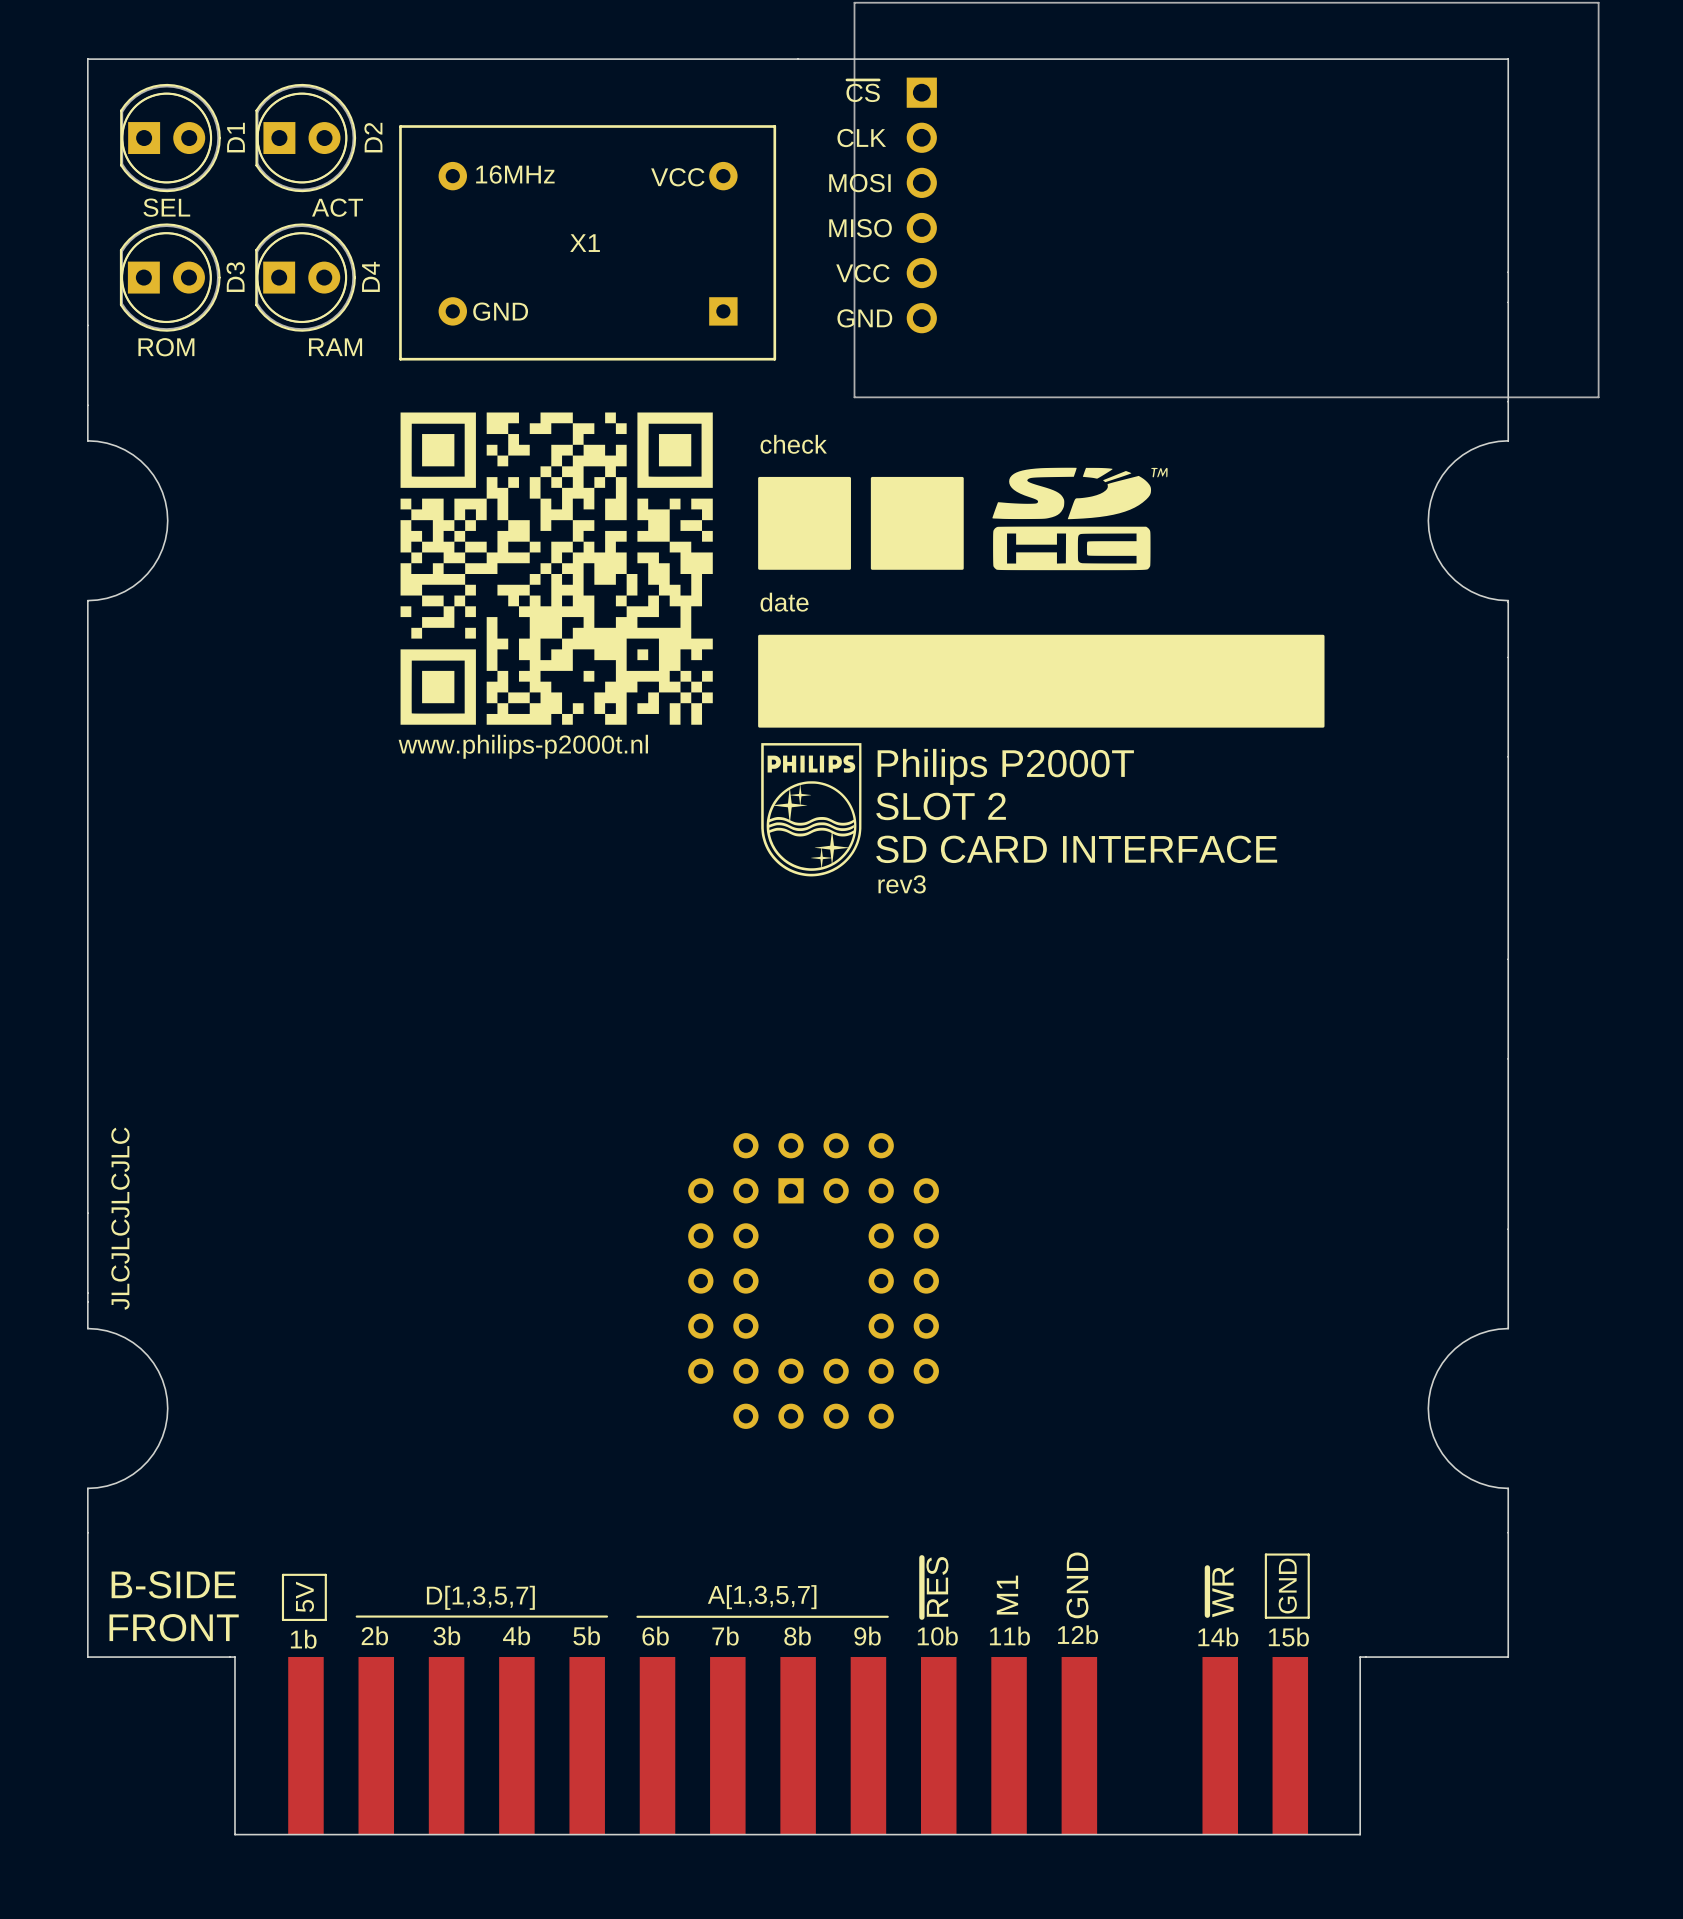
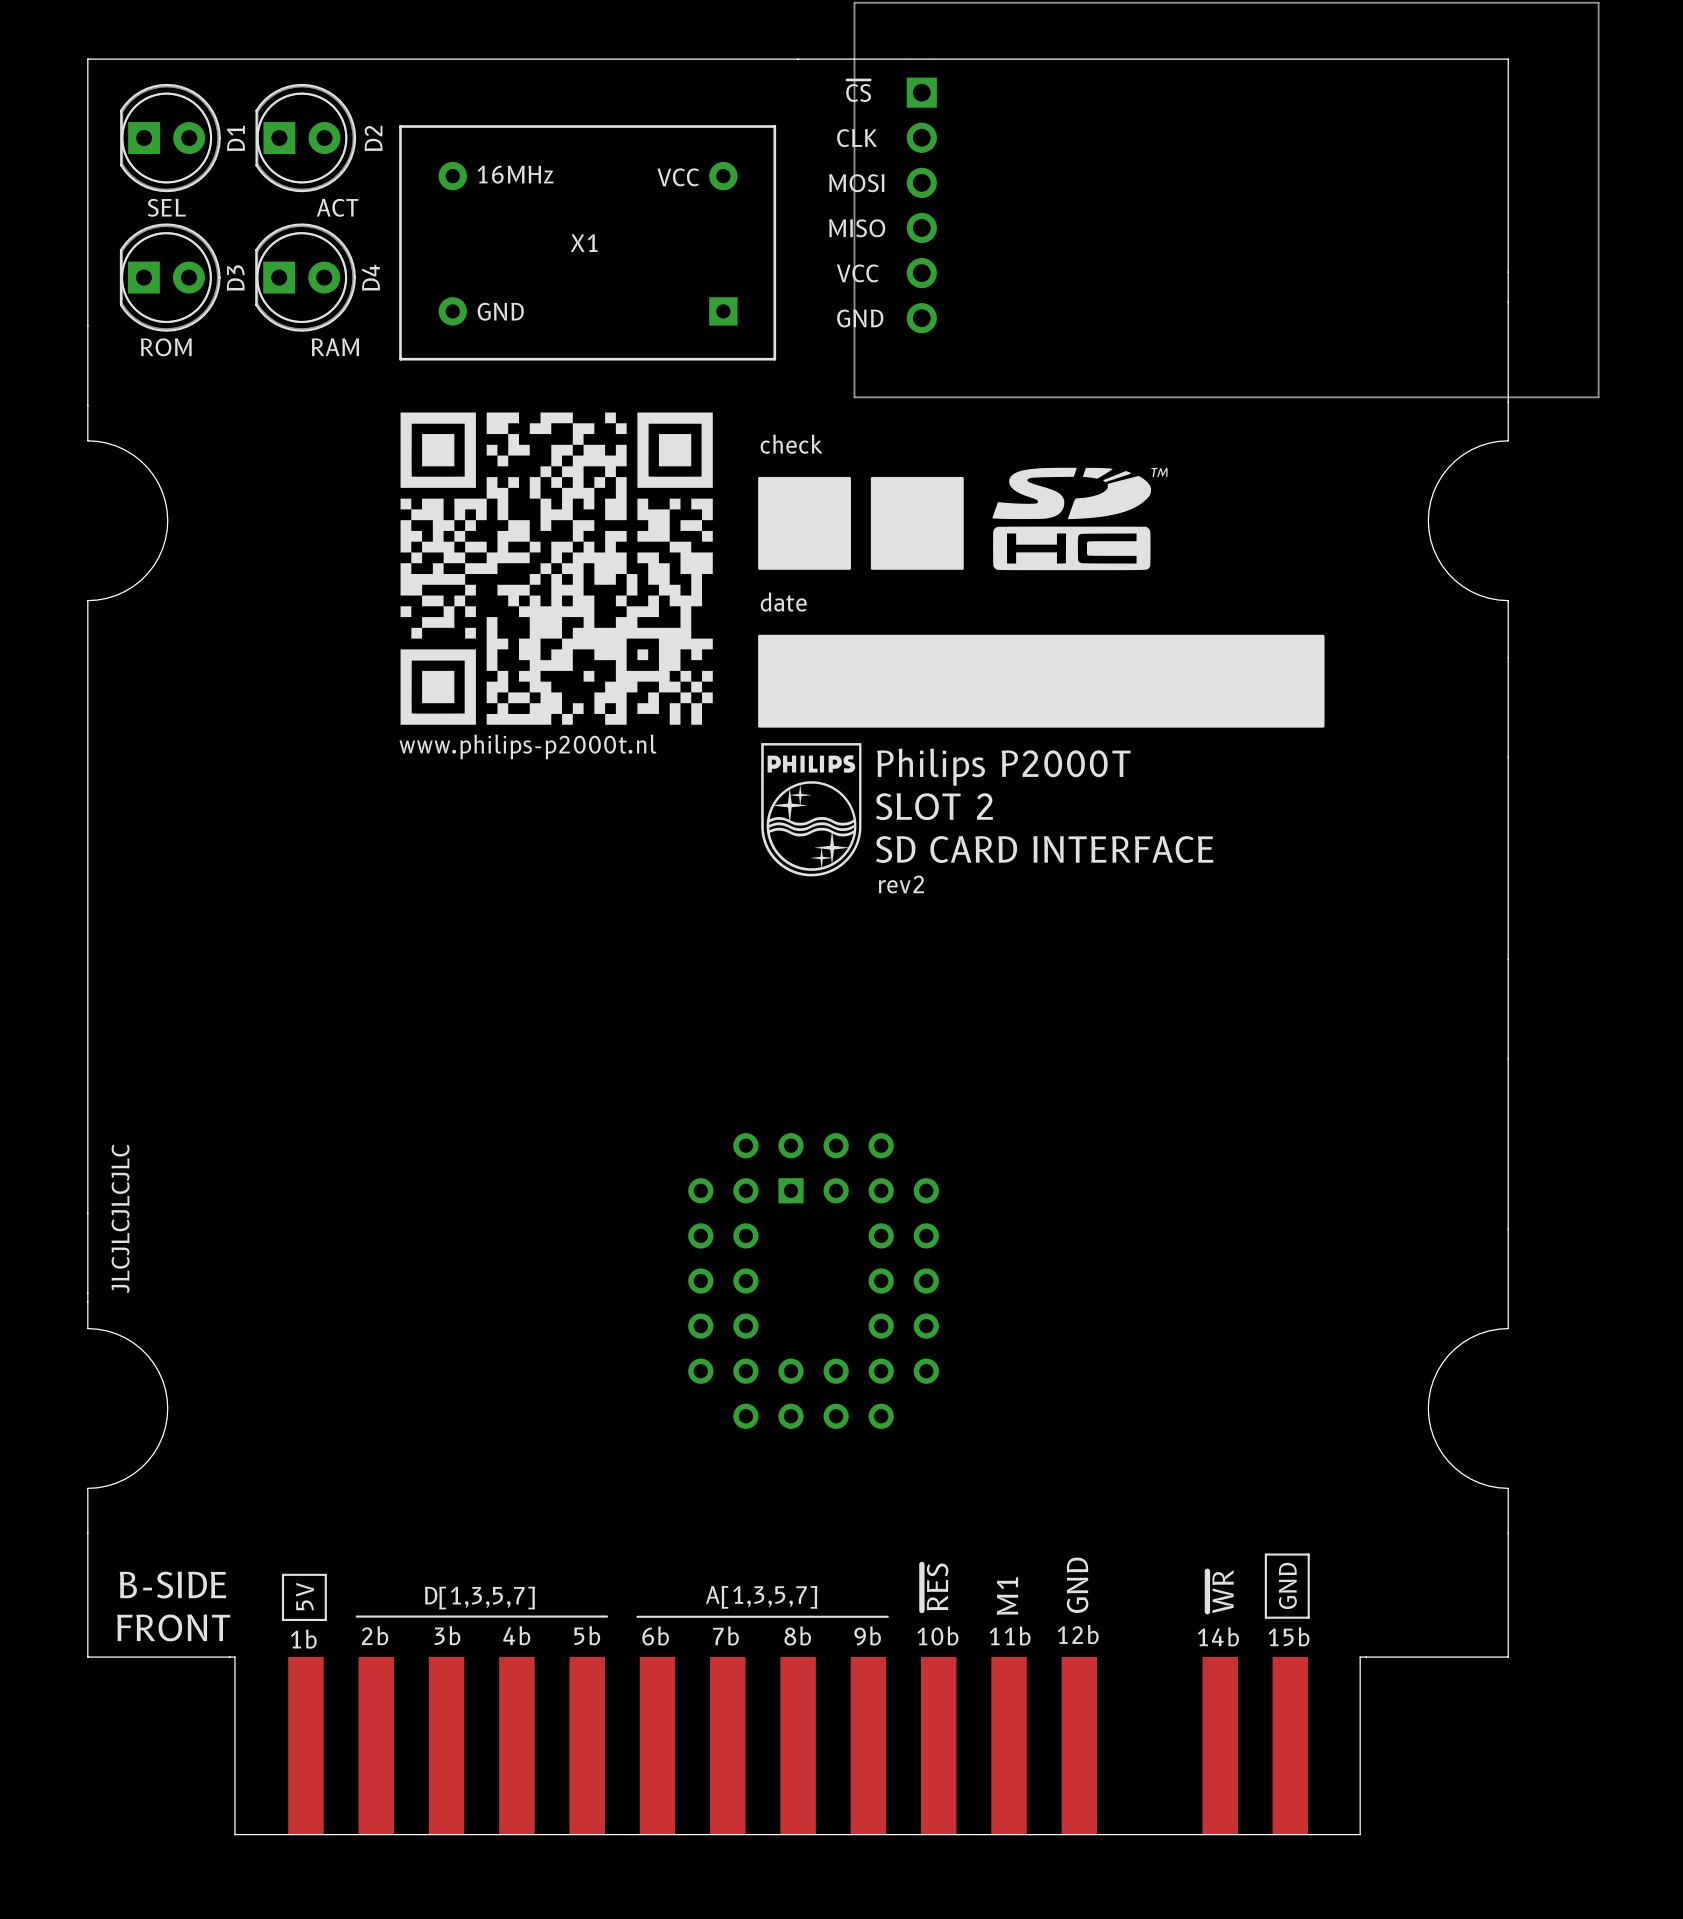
text: rev3 (902, 884) -> rev2 (901, 884)

